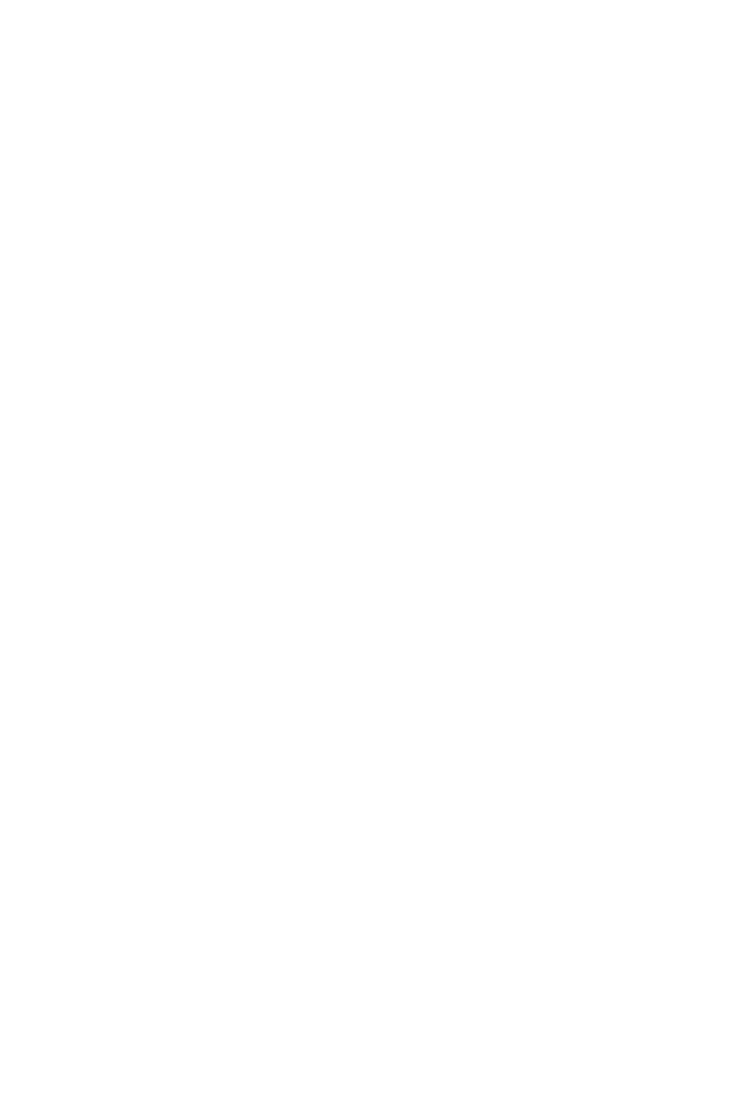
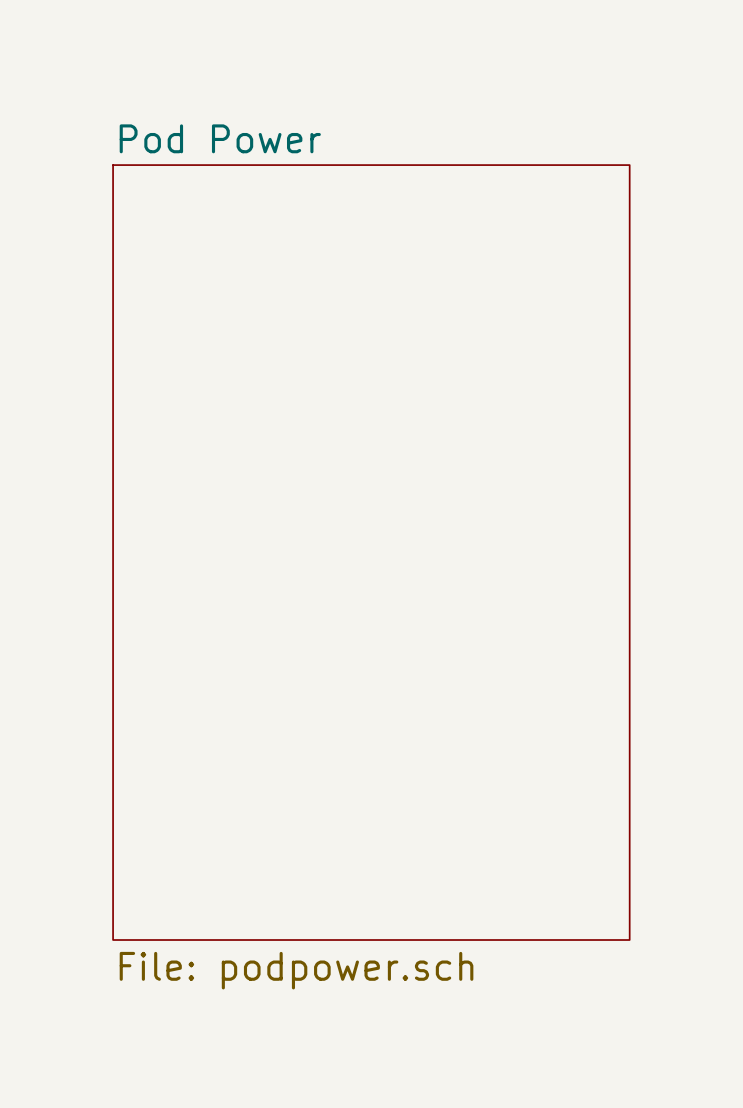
sheet Pod Power: none -> File: podpower.sch (371, 552)

